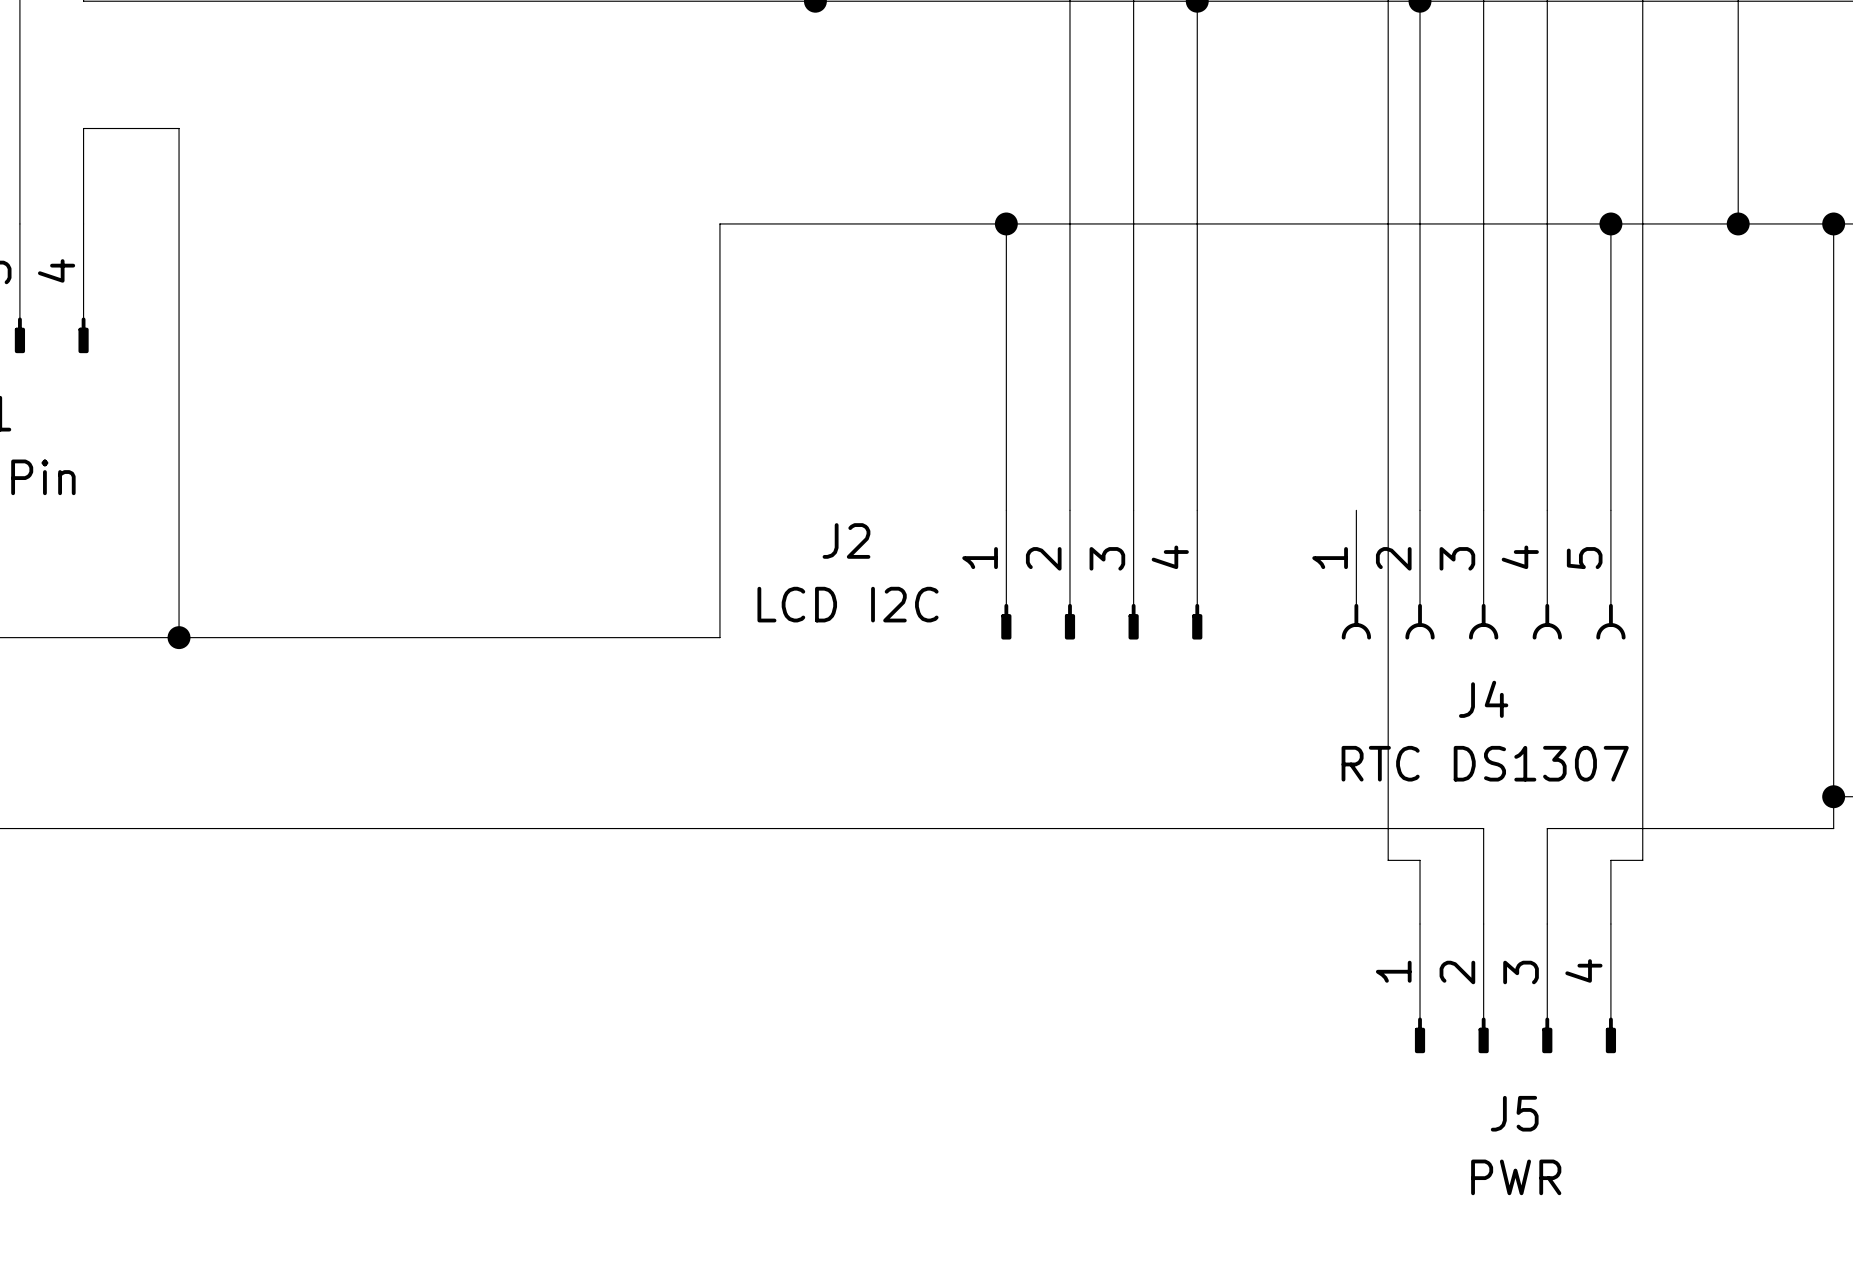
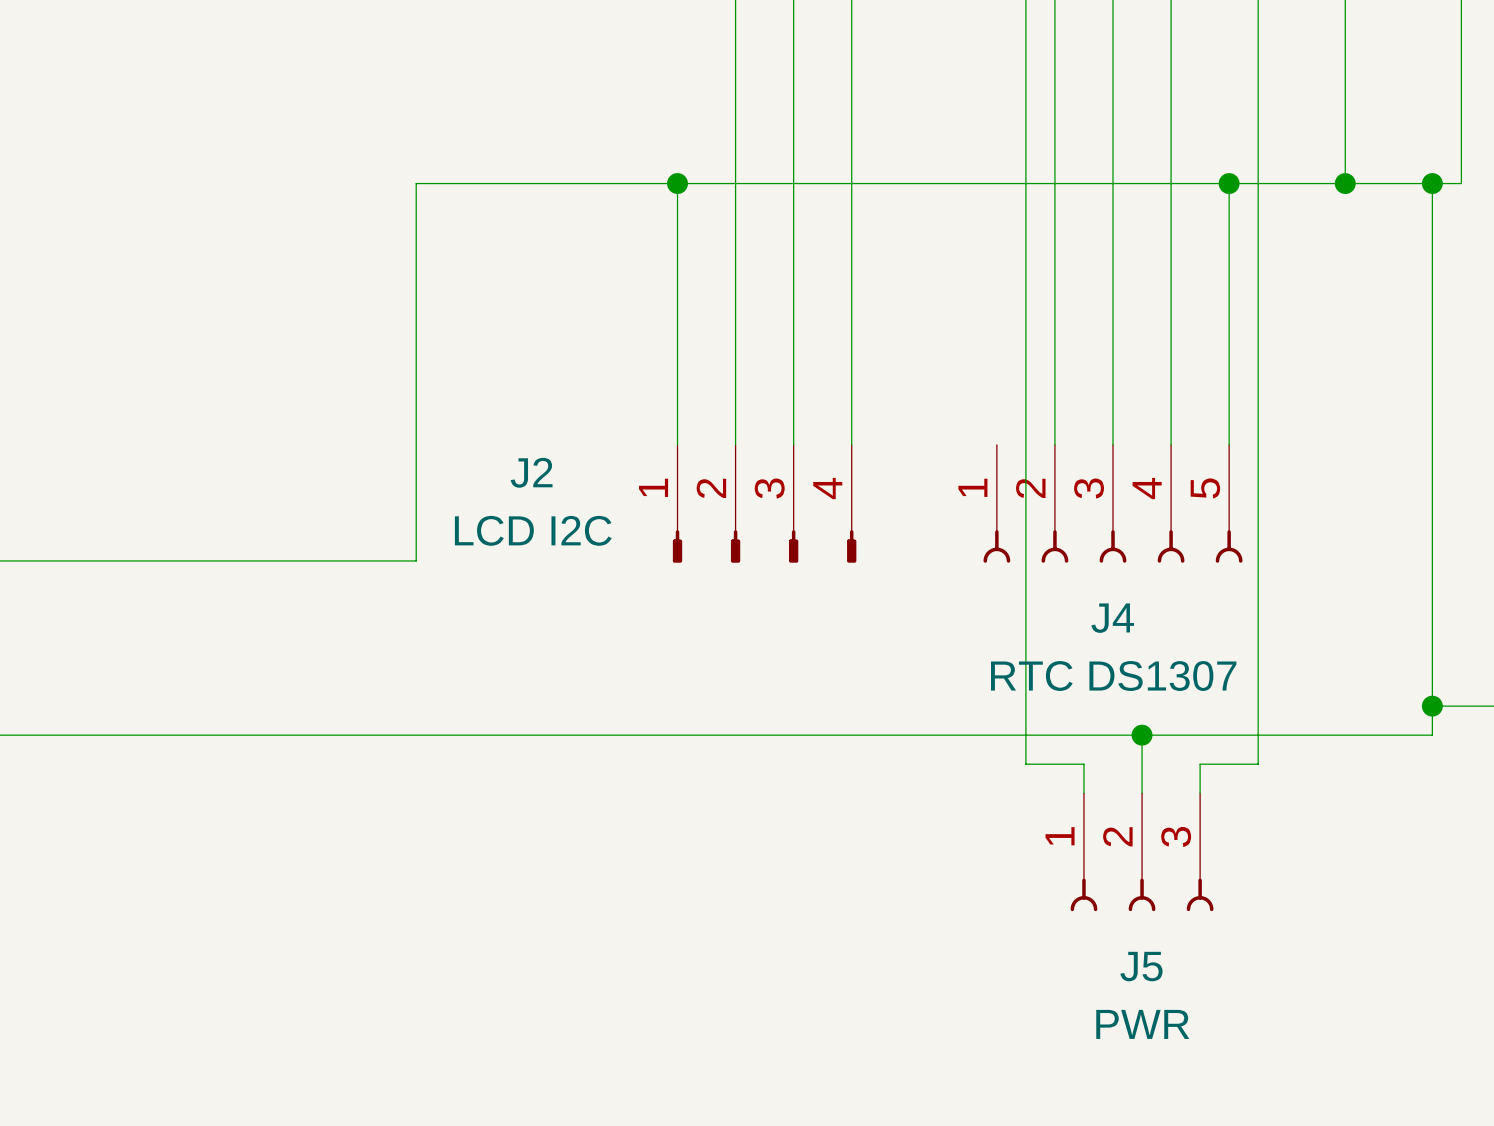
wire: (1483, 828) (1483, 924) -> (1113, 735) (1171, 735)
wire: none -> (1142, 735) (1142, 793)
junction: none -> (1142, 735)
wire: (1547, 828) (1547, 924) -> none
wire: (1420, 860) (1420, 924) -> (1054, 764) (1083, 764) (1083, 793)
wire: (1610, 860) (1610, 924) -> (1229, 764) (1200, 764) (1200, 793)
J5 symbol: [1414, 924, 1617, 1054] -> [1070, 793, 1214, 912]

